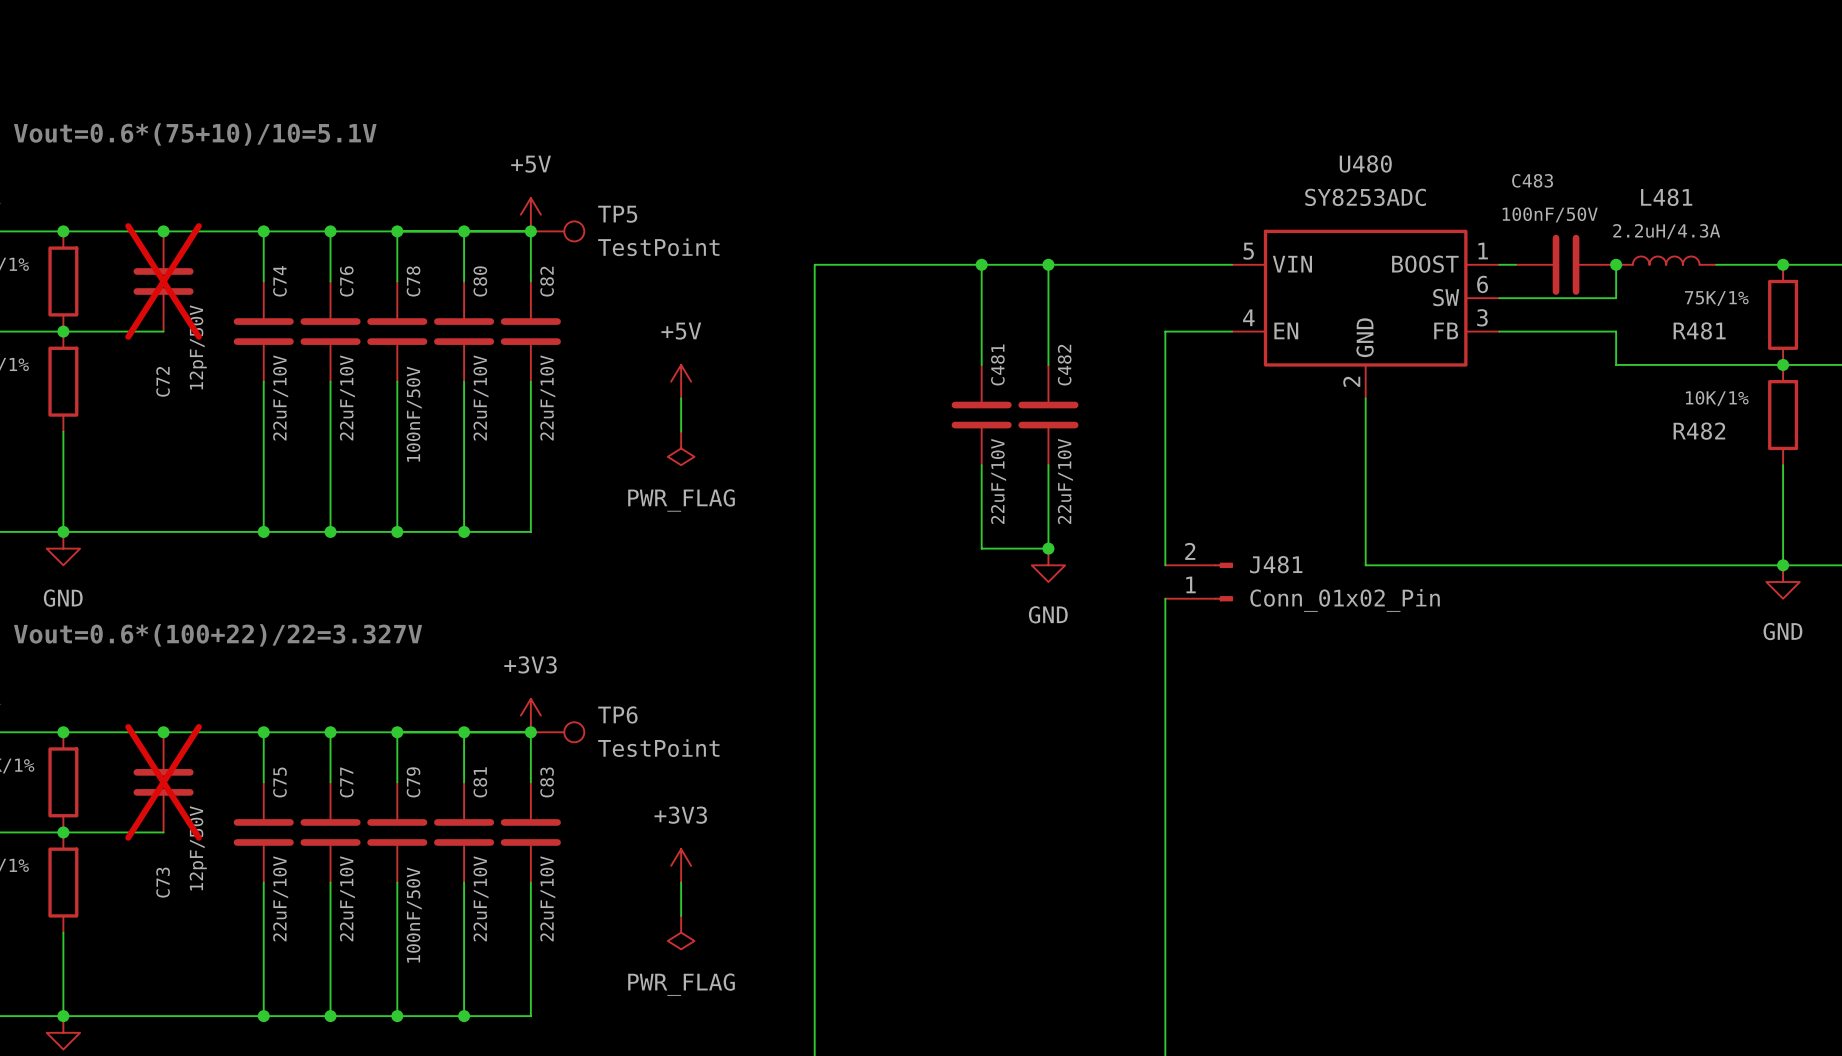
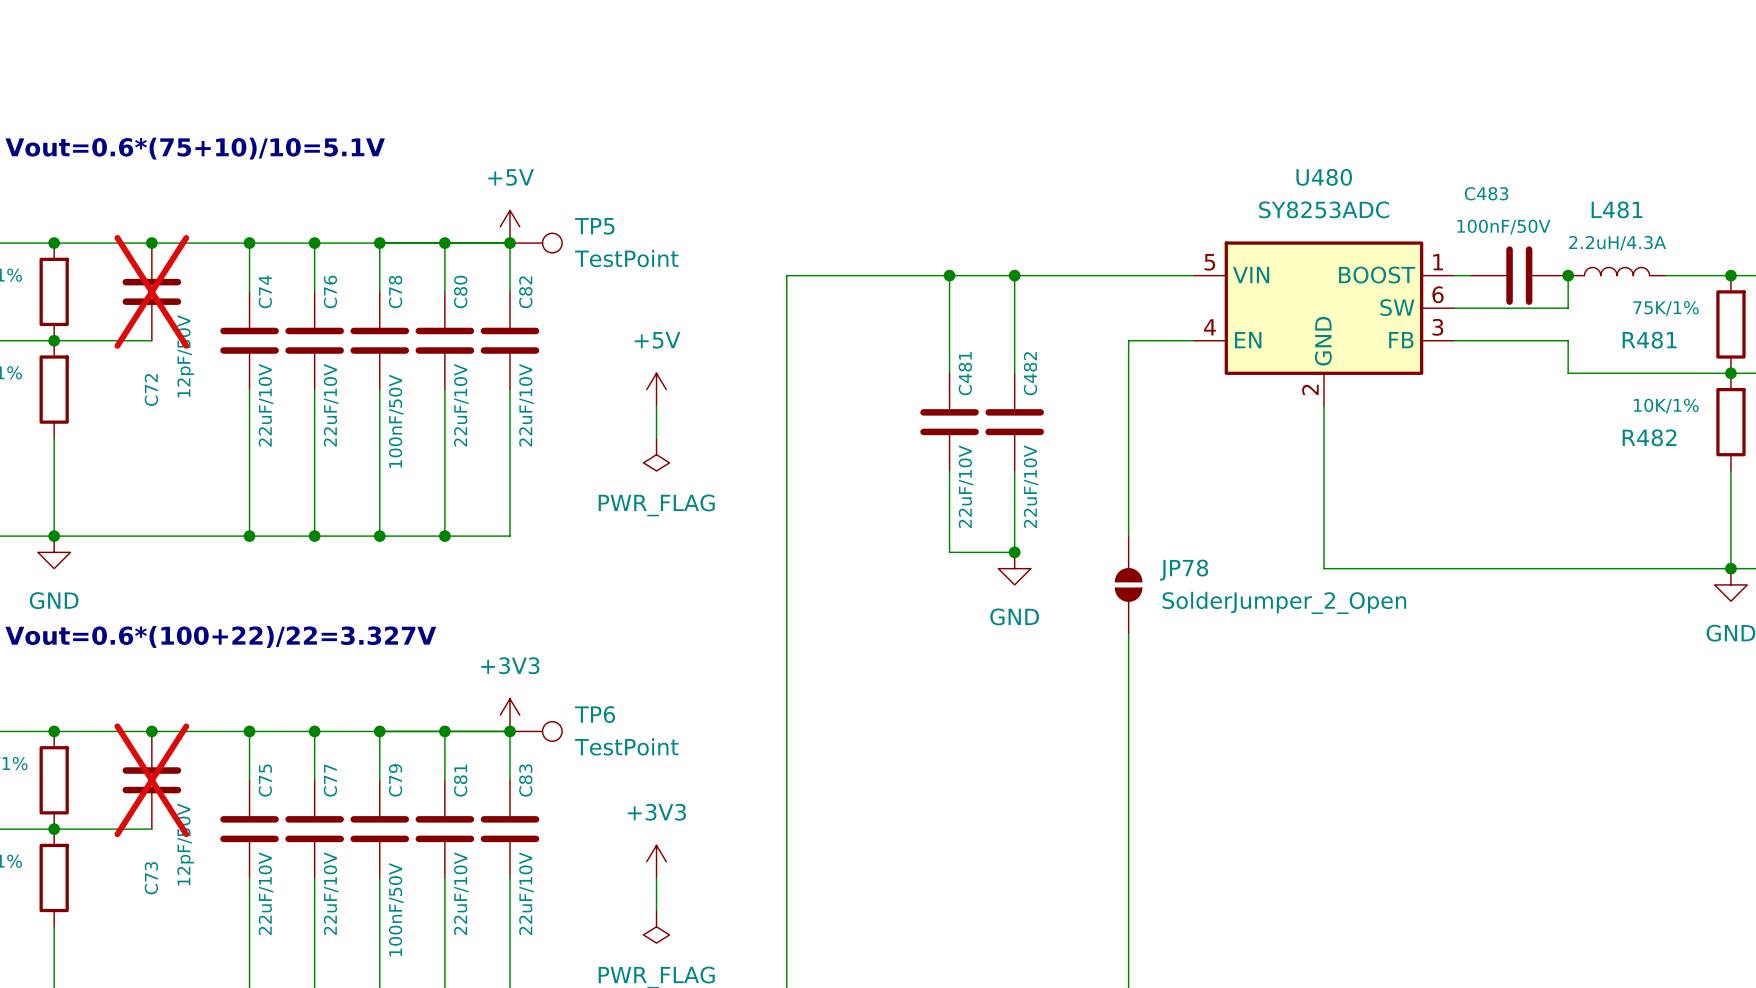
JP78: none -> SolderJumper_2_Open (1128, 584)
J481: Conn_01x02_Pin (1199, 582) -> none

